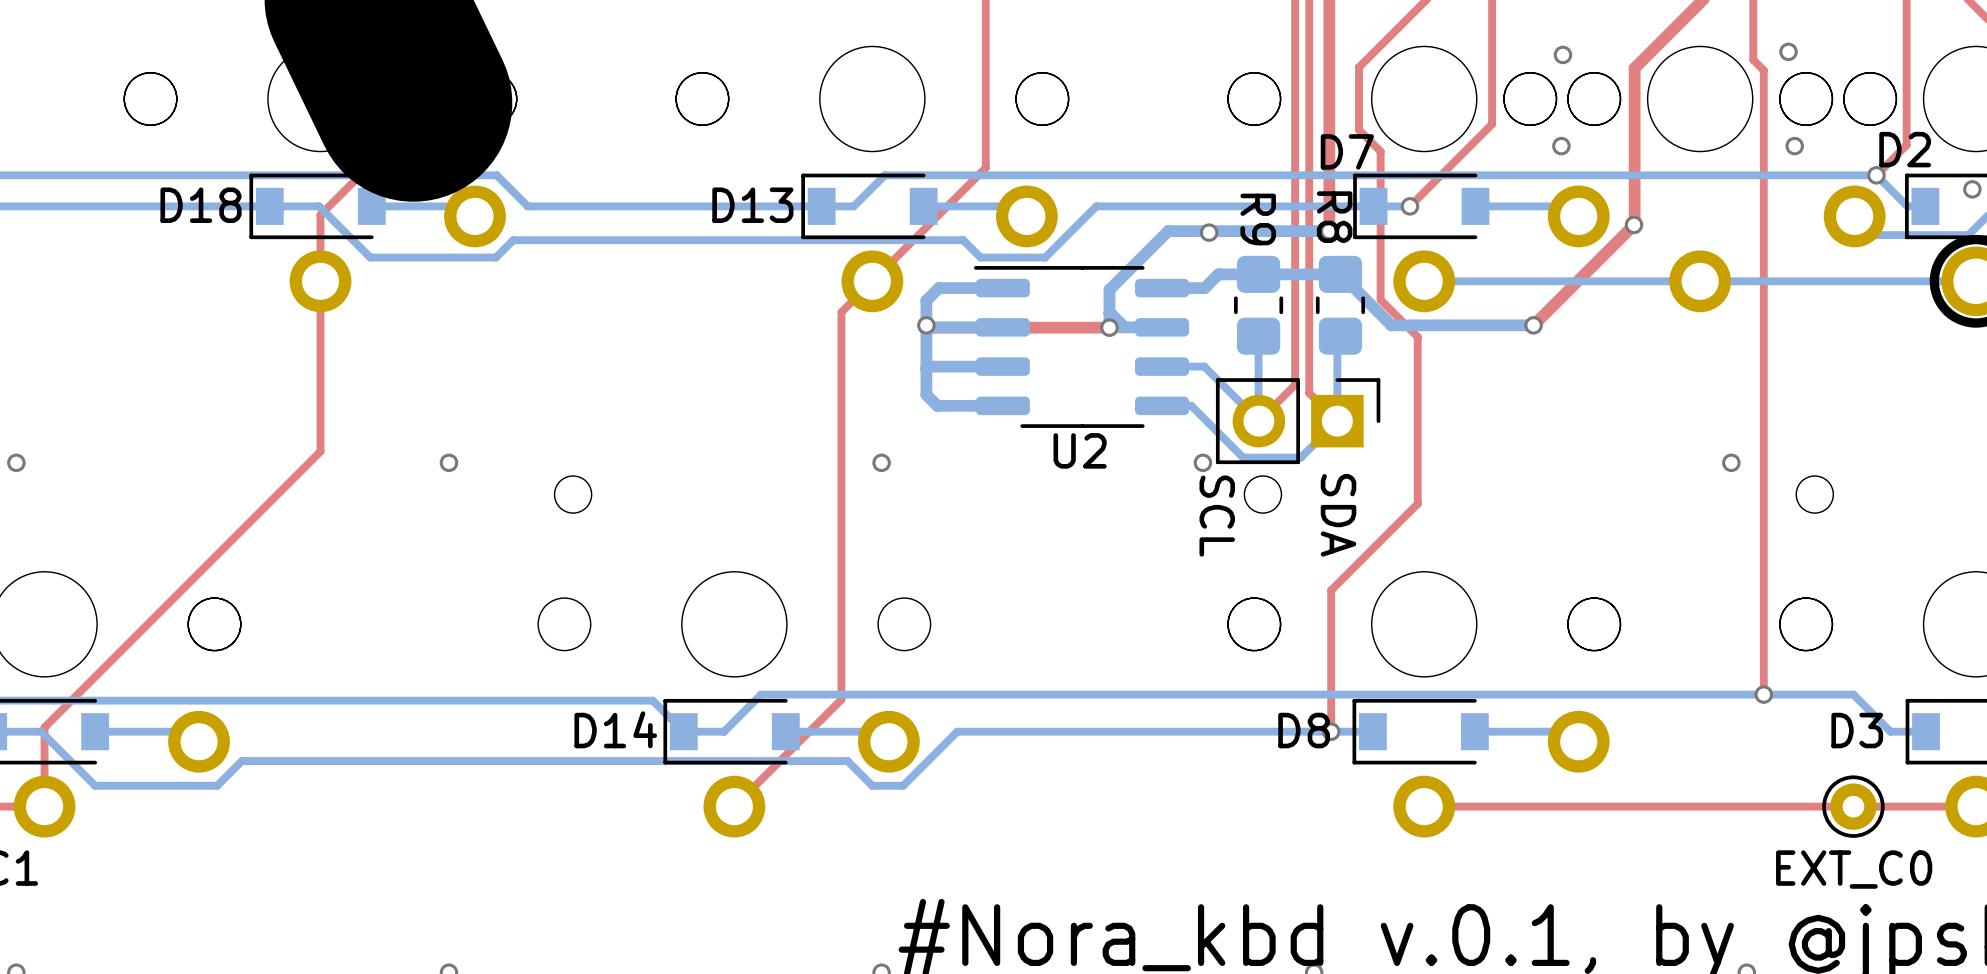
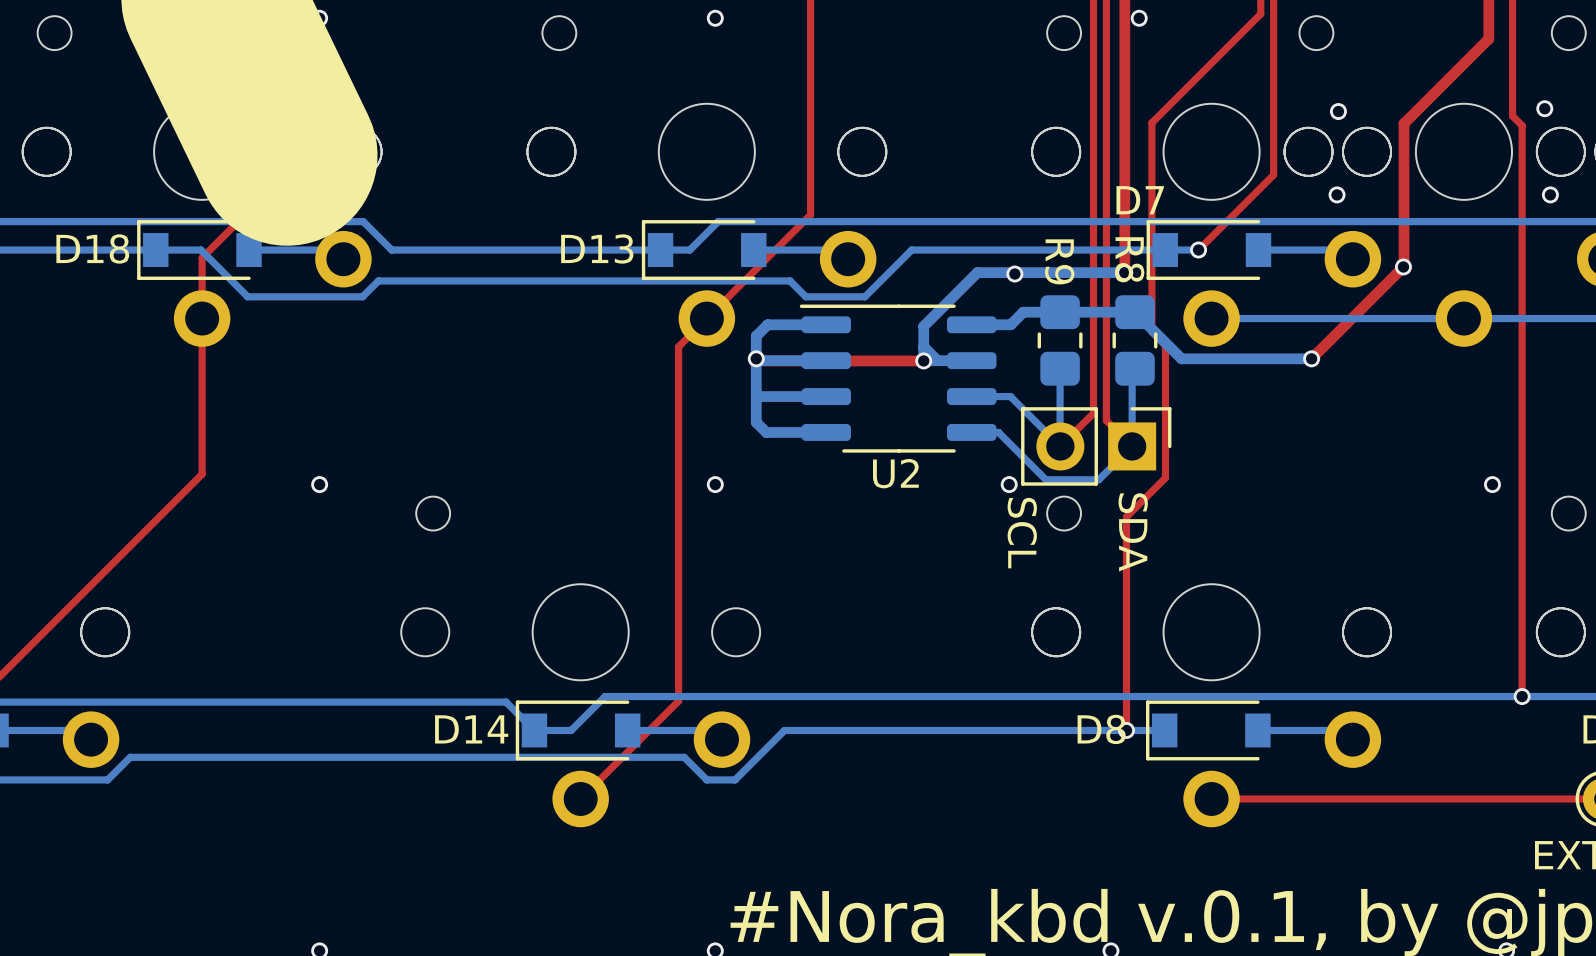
top track: (1359, 129) (1380, 151) (1380, 299) (1417, 336) (1417, 503) (1331, 590) -> (1151, 180) (1151, 331) (1165, 345) (1165, 477) (1126, 516) (1126, 601)

